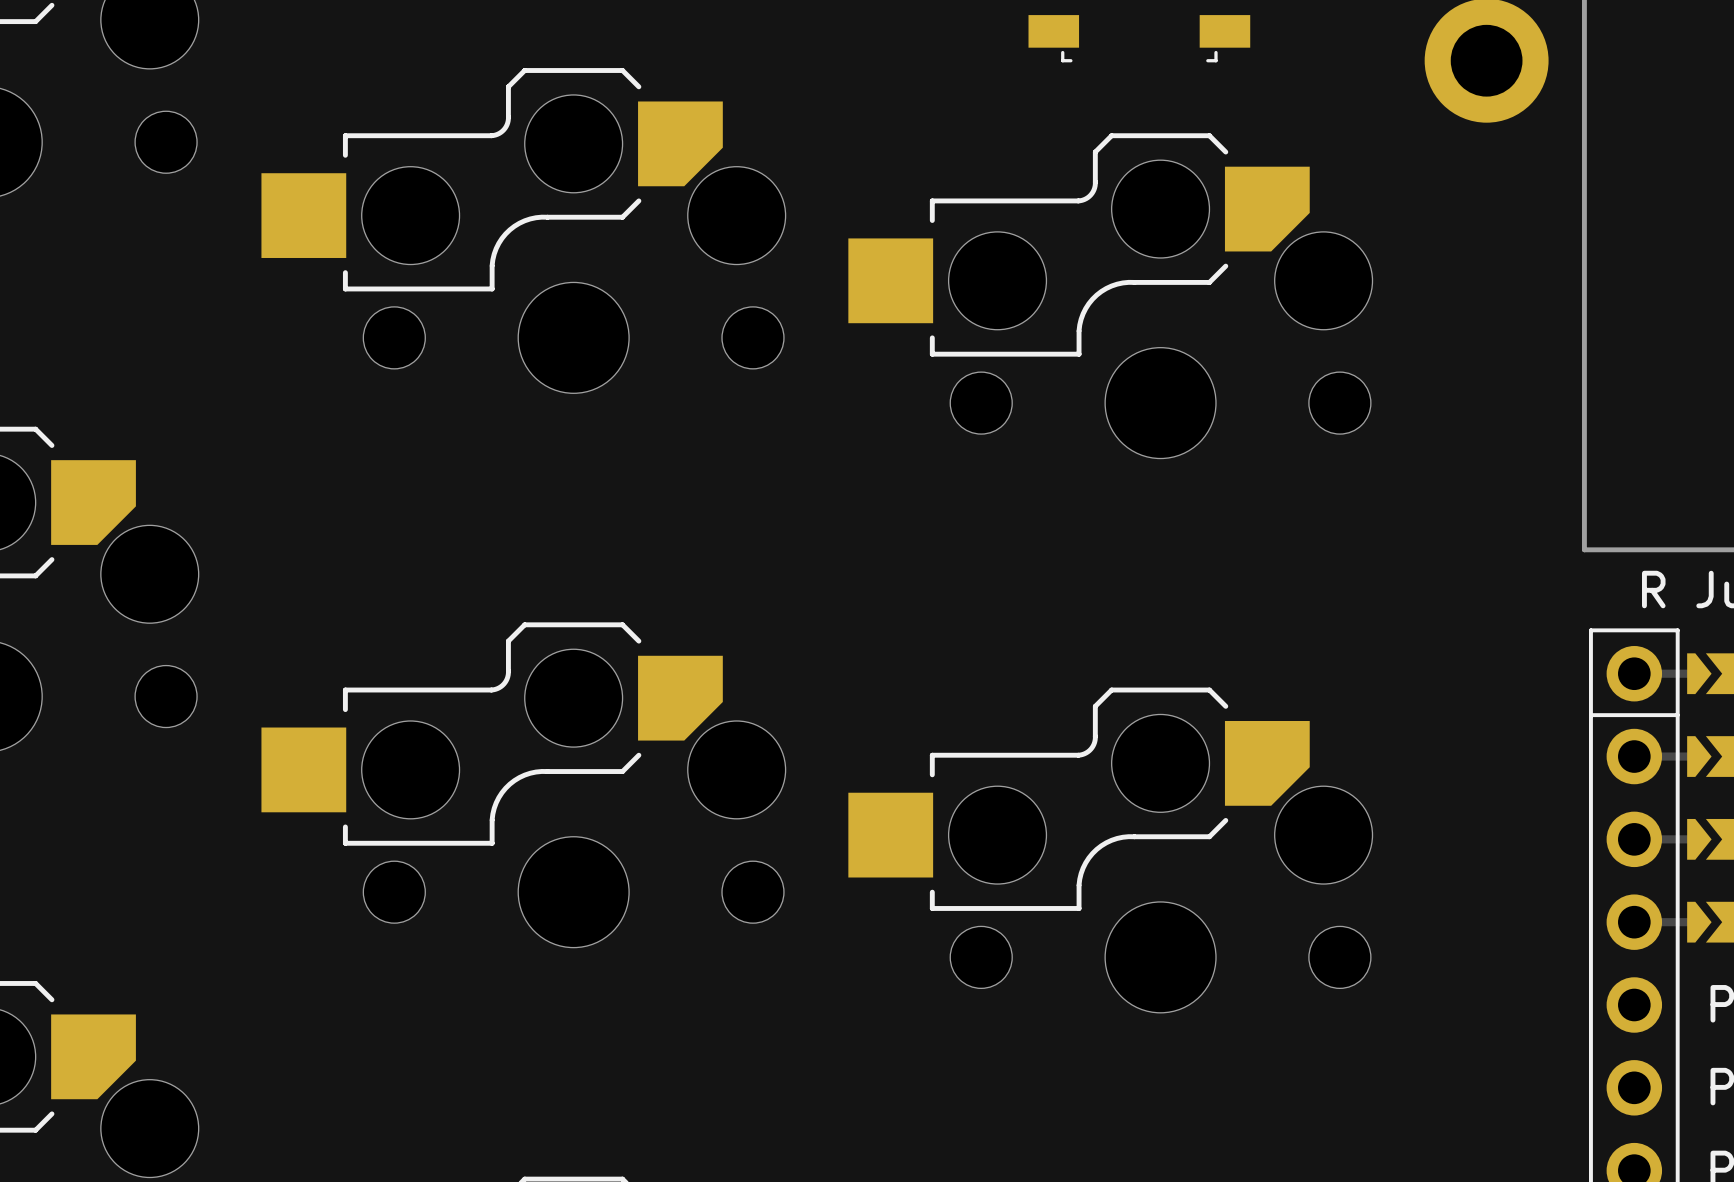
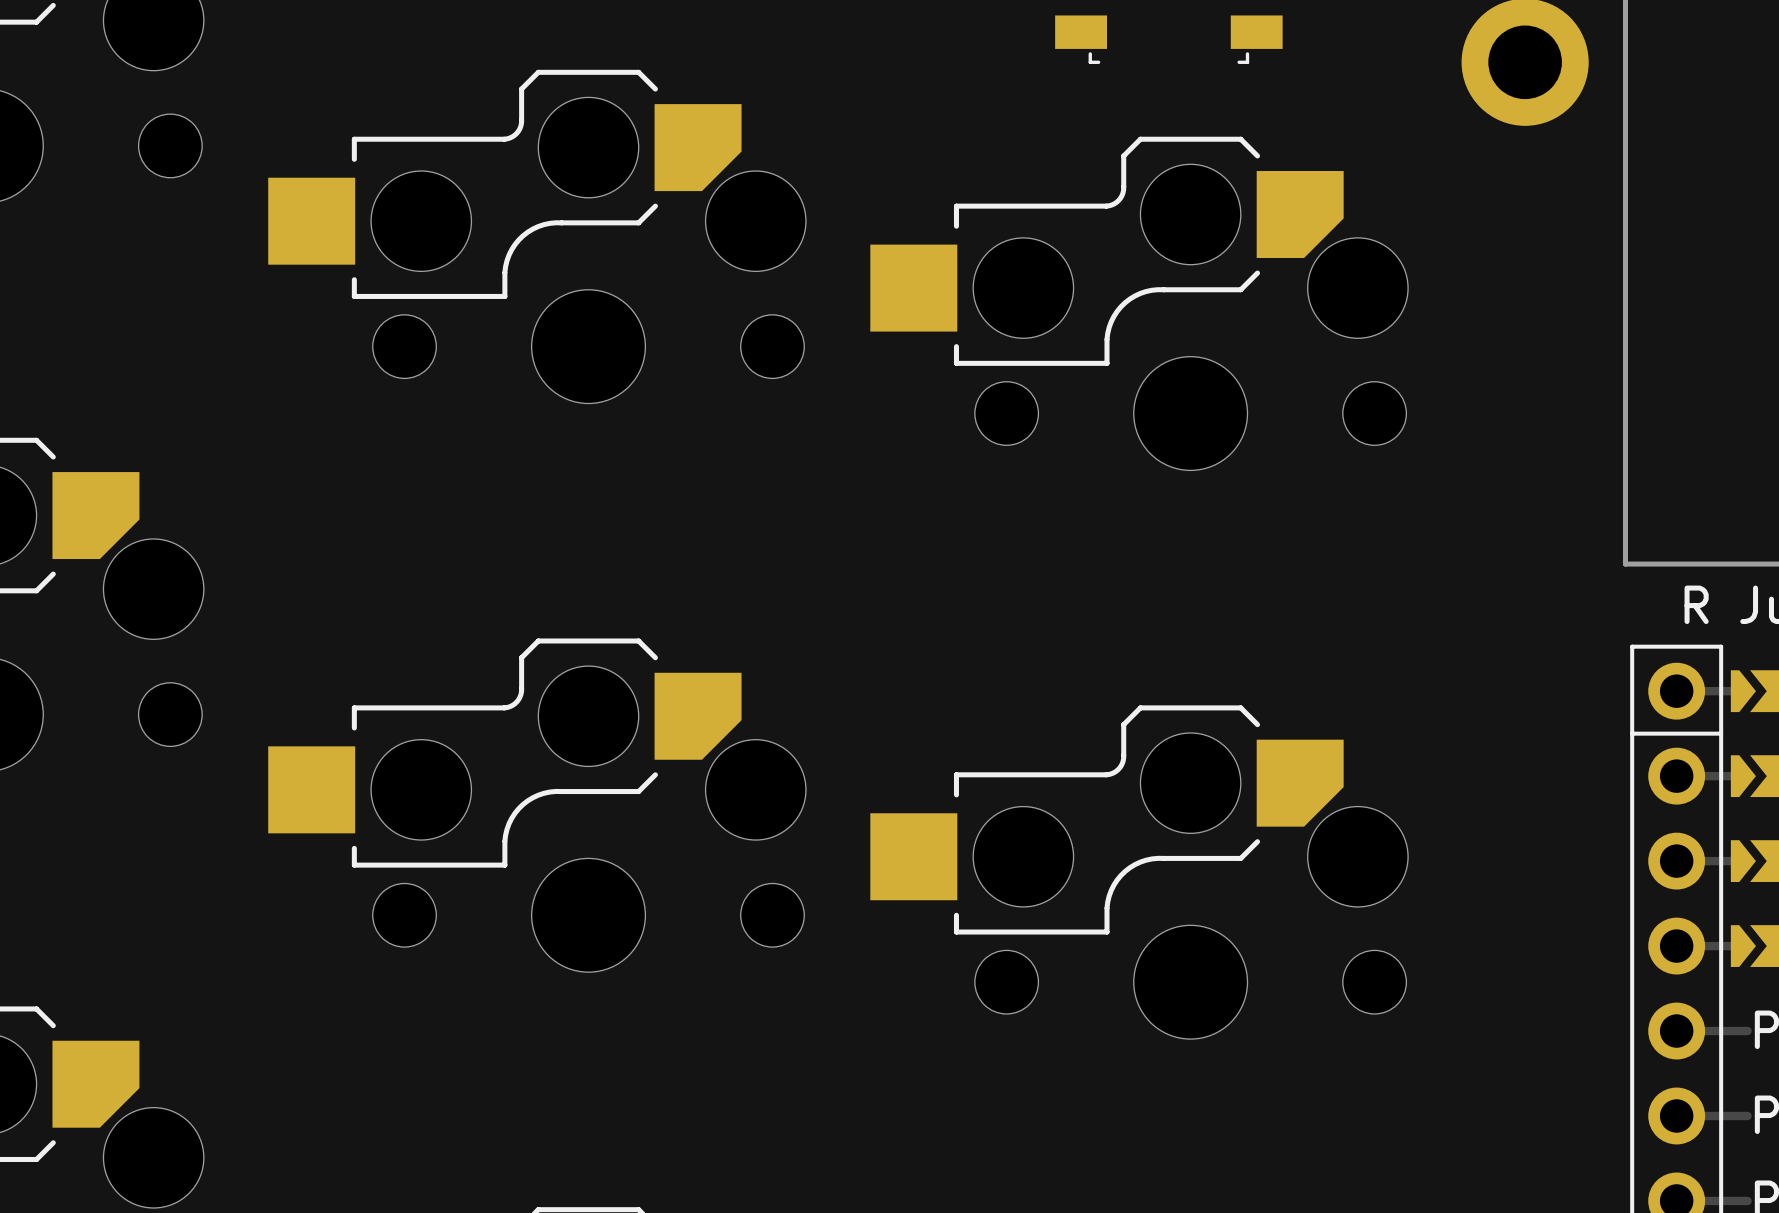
track: none -> (1676, 1031) (1747, 1031)
track: none -> (1676, 1116) (1747, 1116)
track: none -> (1676, 1200) (1747, 1200)

